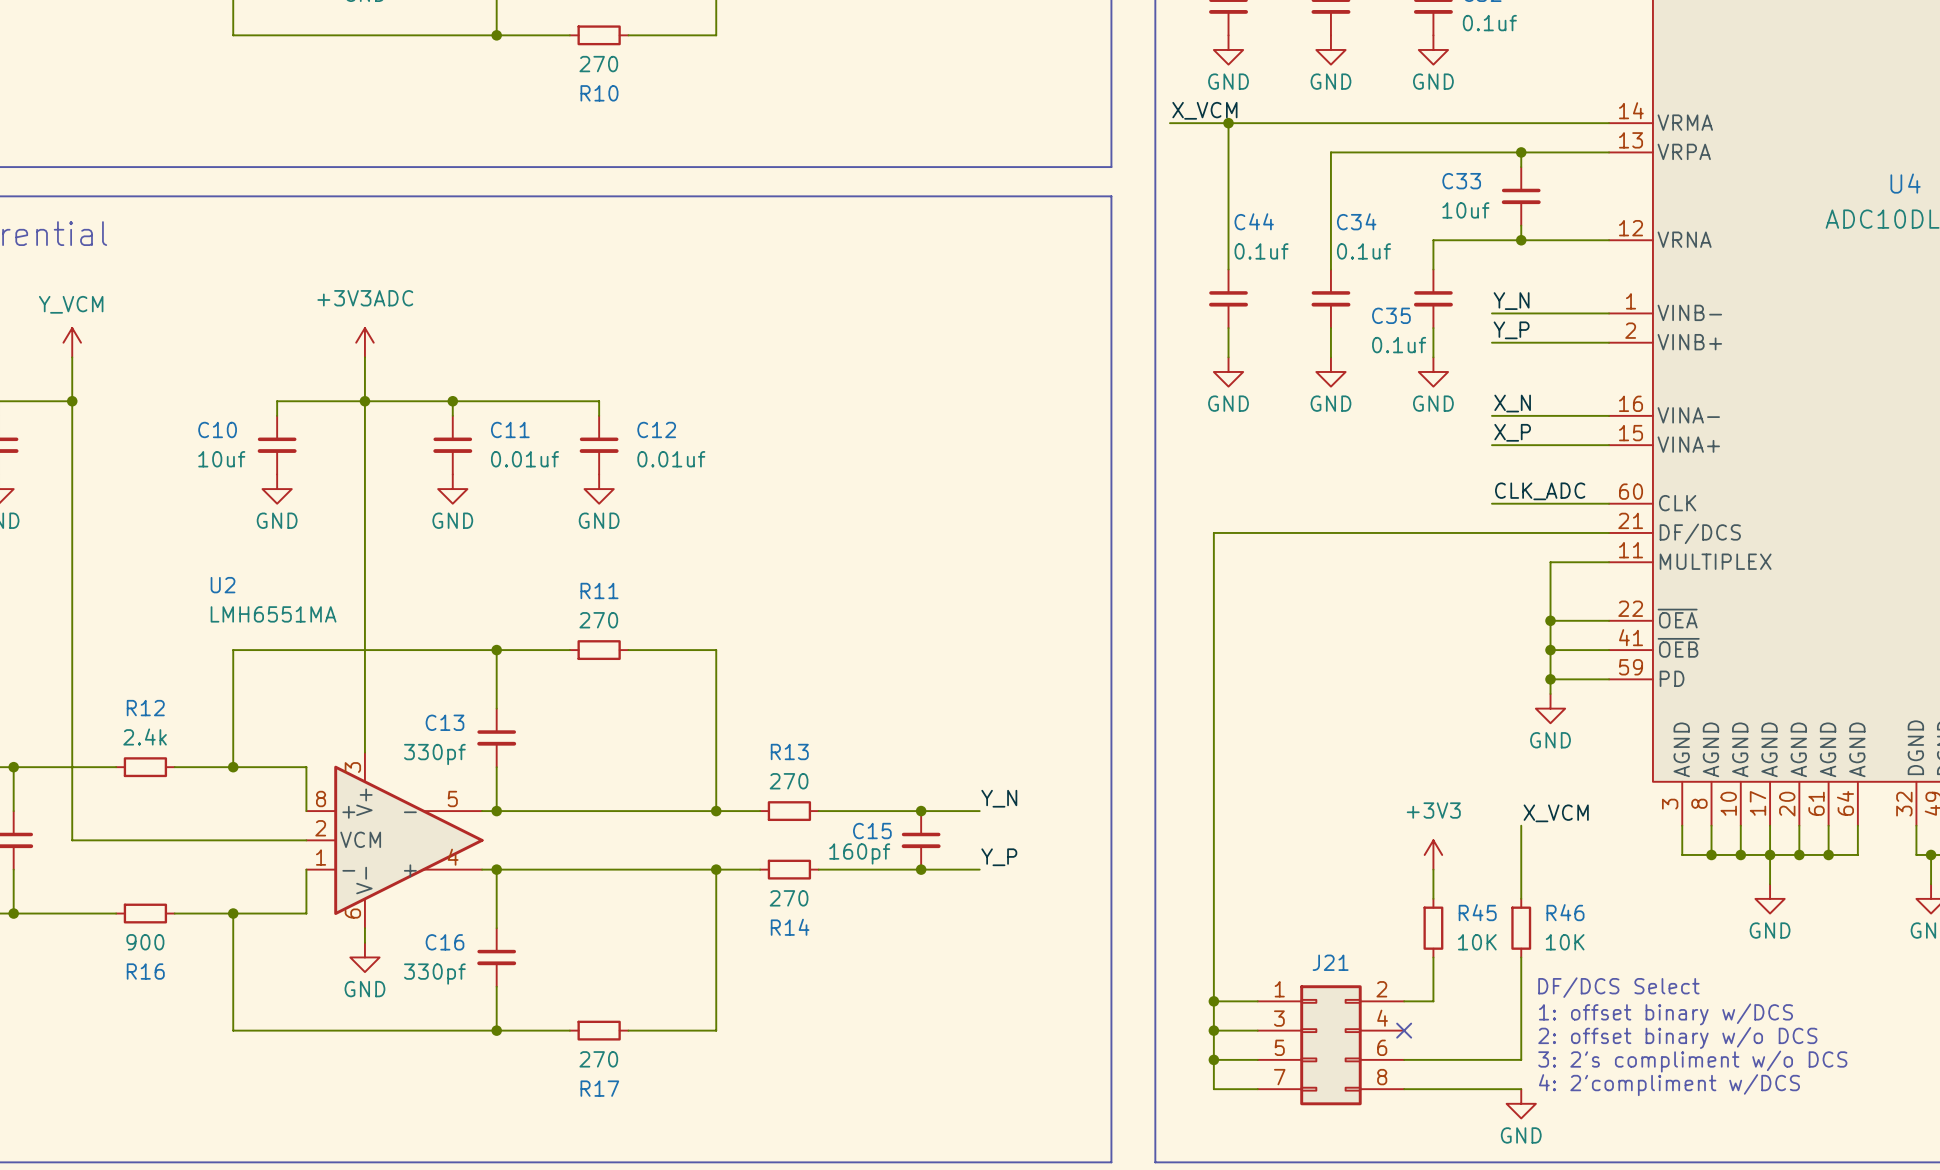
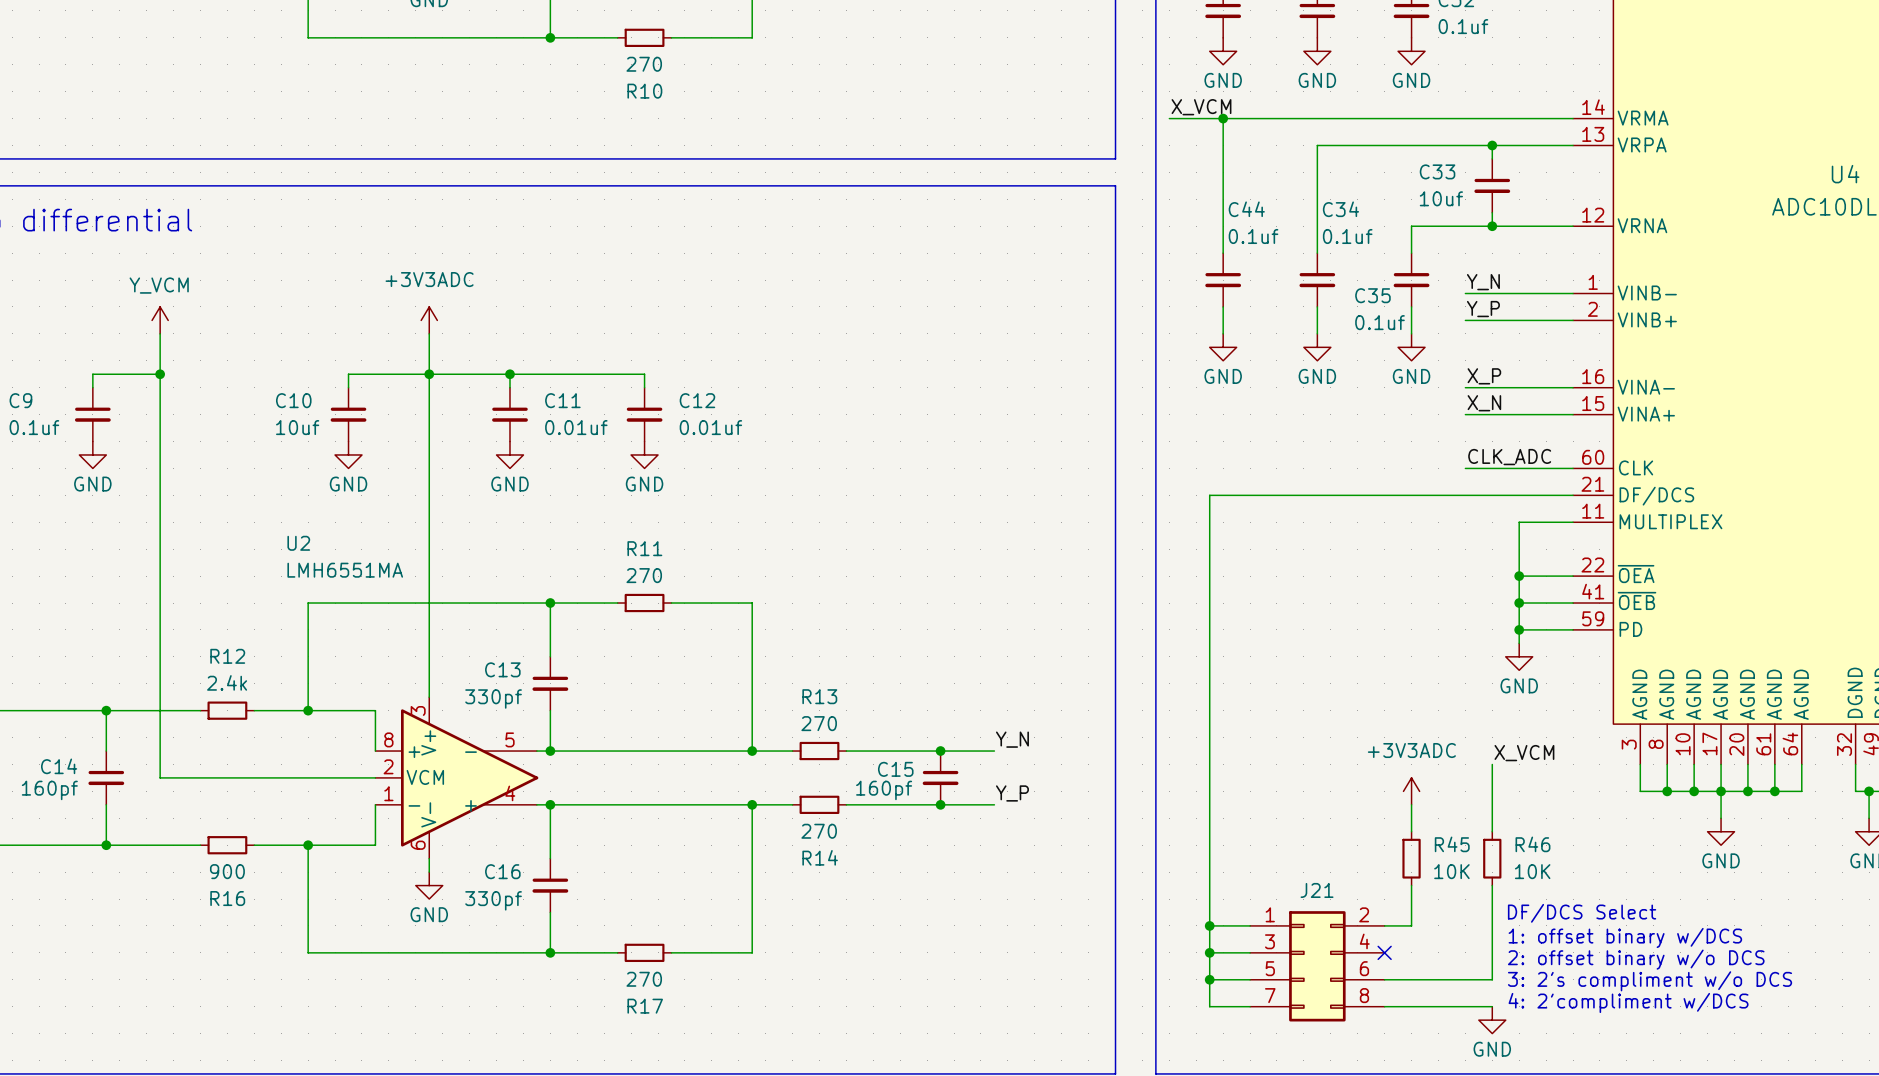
label: X_N (1512, 403) -> X_P (1484, 376)
label: X_P (1512, 432) -> X_N (1484, 403)
power symbol: +3V3 (1433, 854) -> +3V3ADC (1411, 791)

